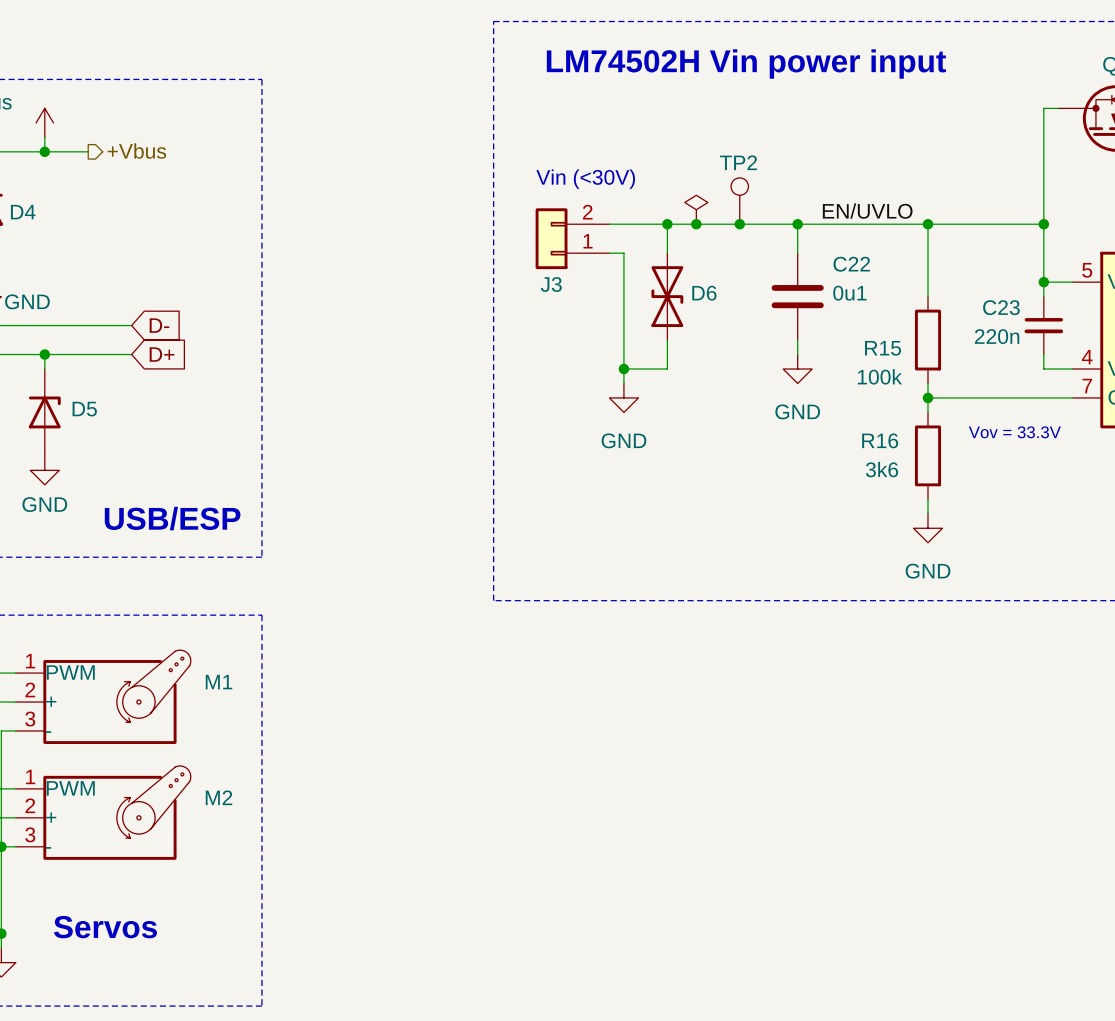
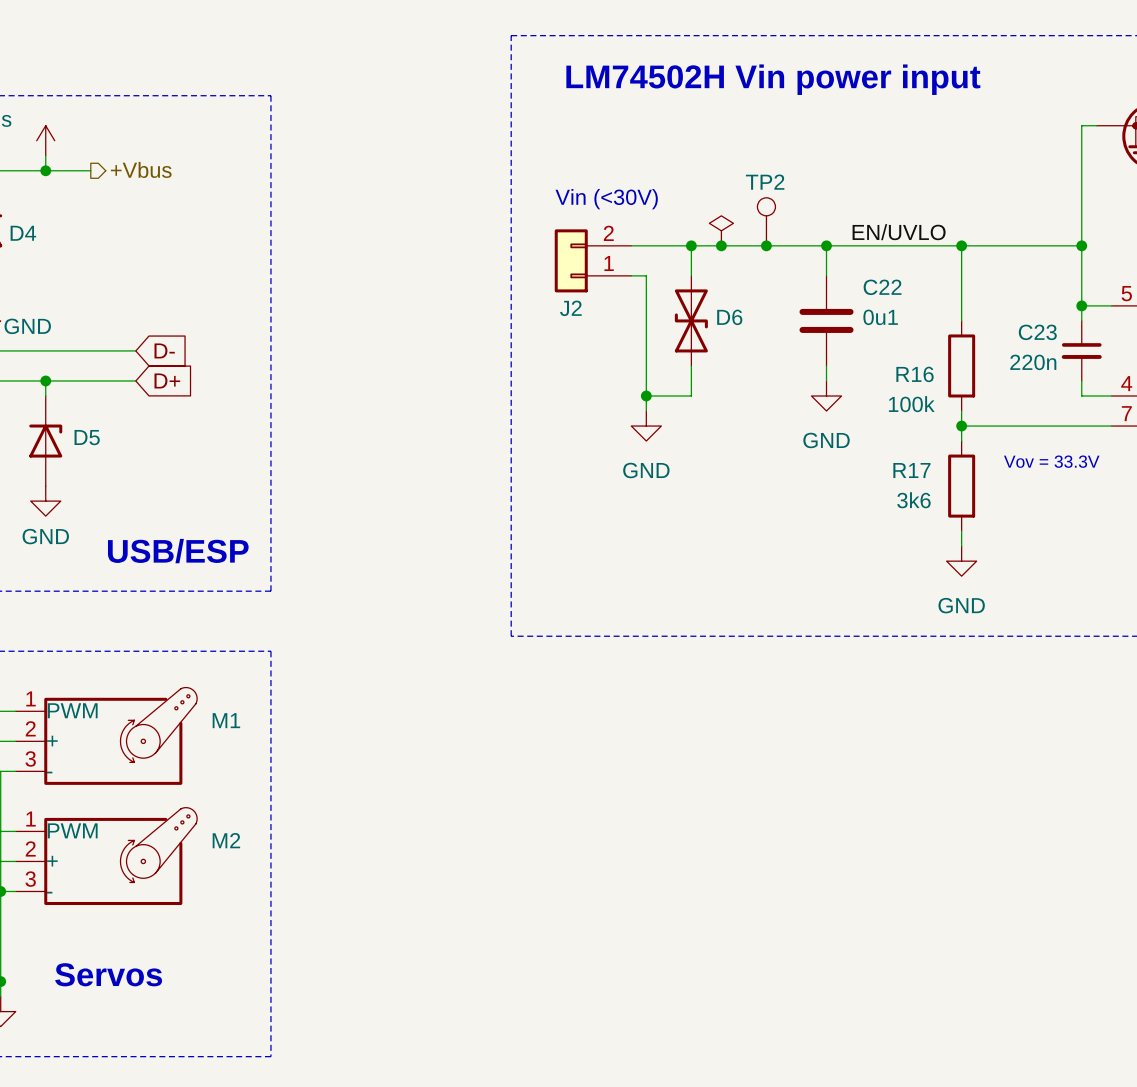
J3 name: J3 (551, 284) -> J2 (570, 308)
R15 name: R15 (883, 348) -> R16 (915, 374)
R16 name: R16 (880, 440) -> R17 (911, 470)

